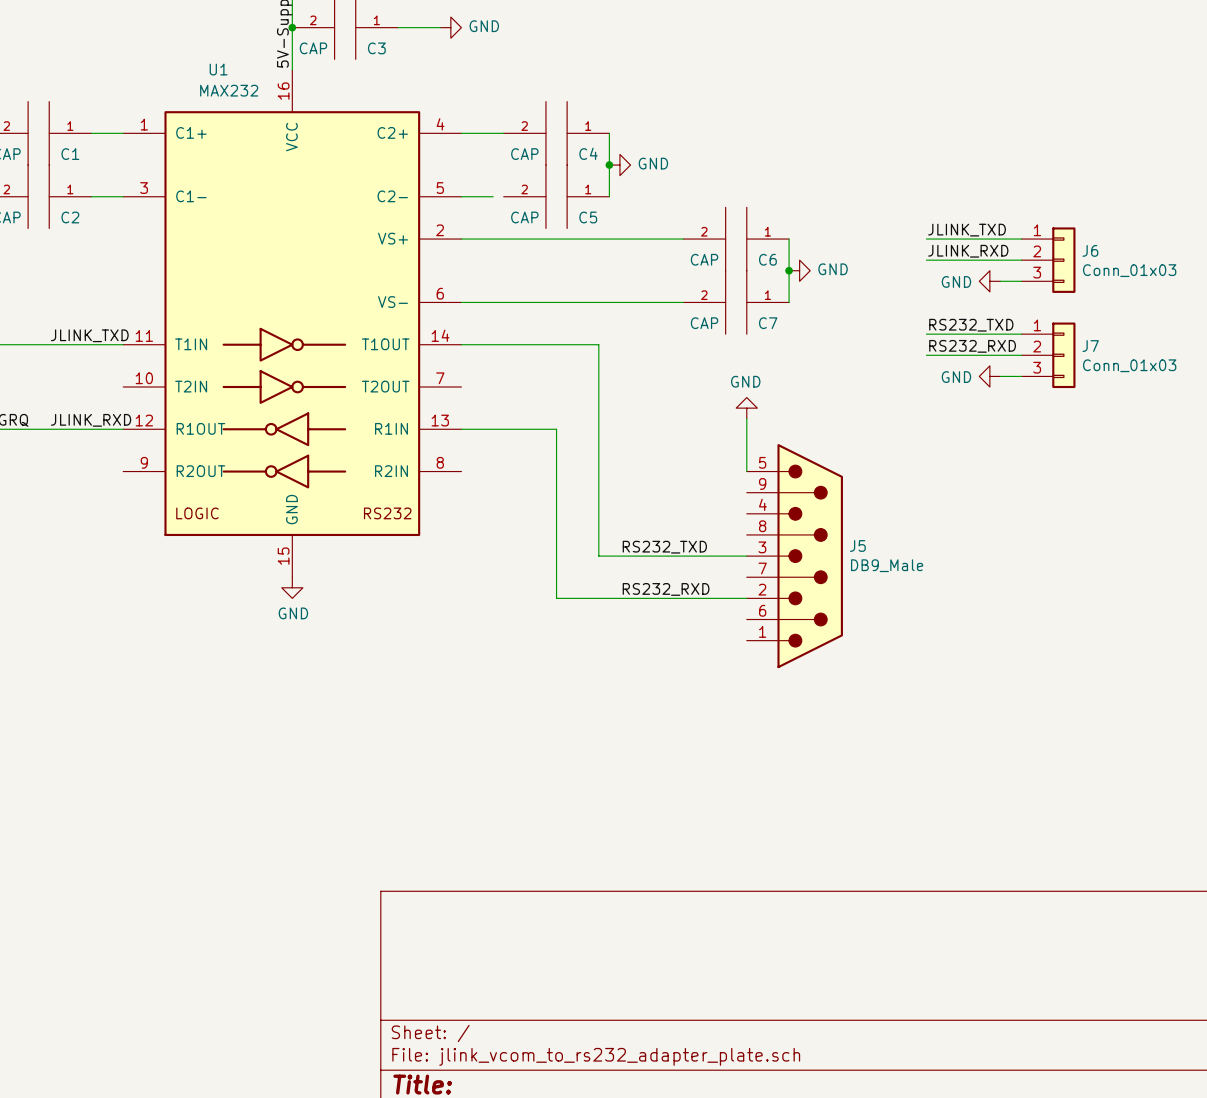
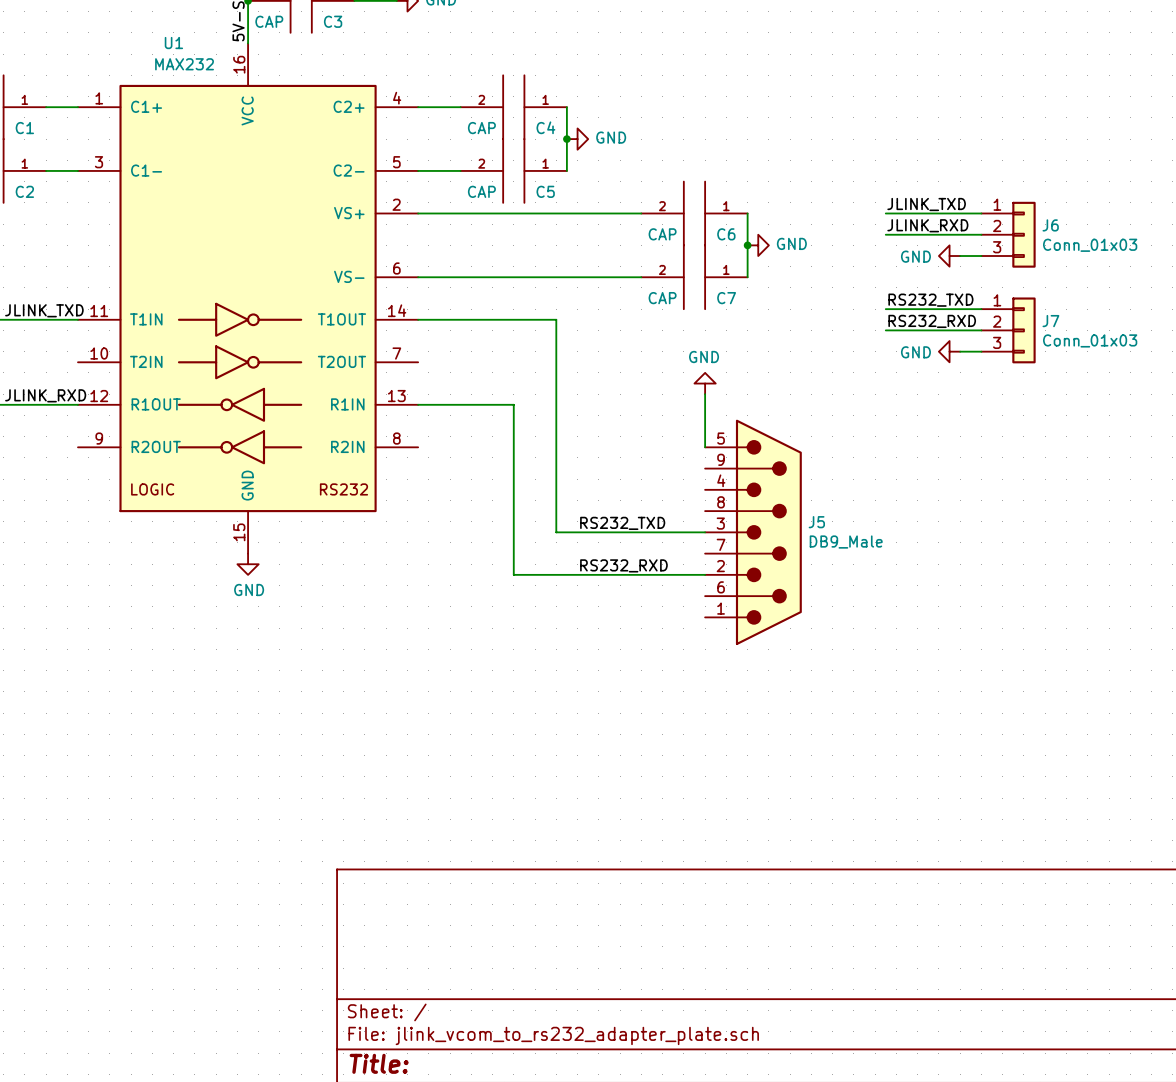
wire: none -> (450, 170) (460, 170)

